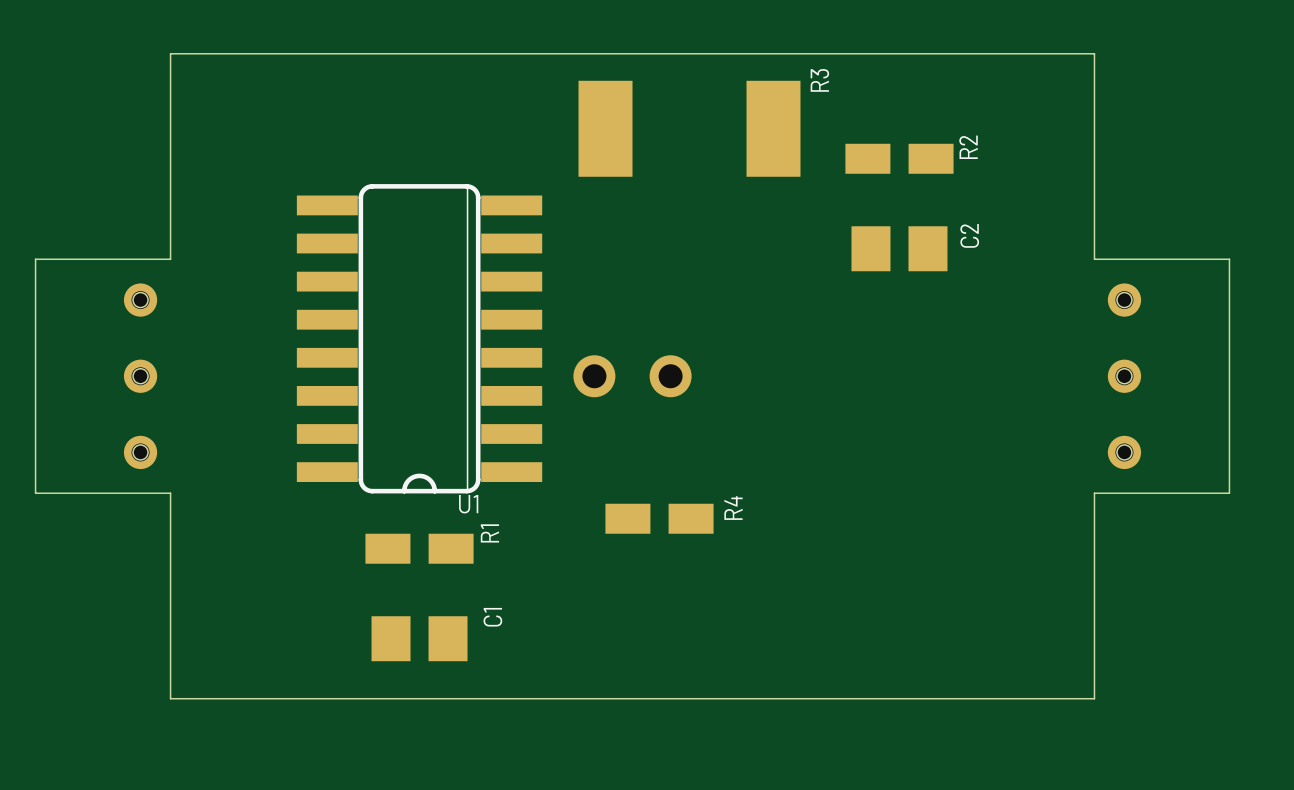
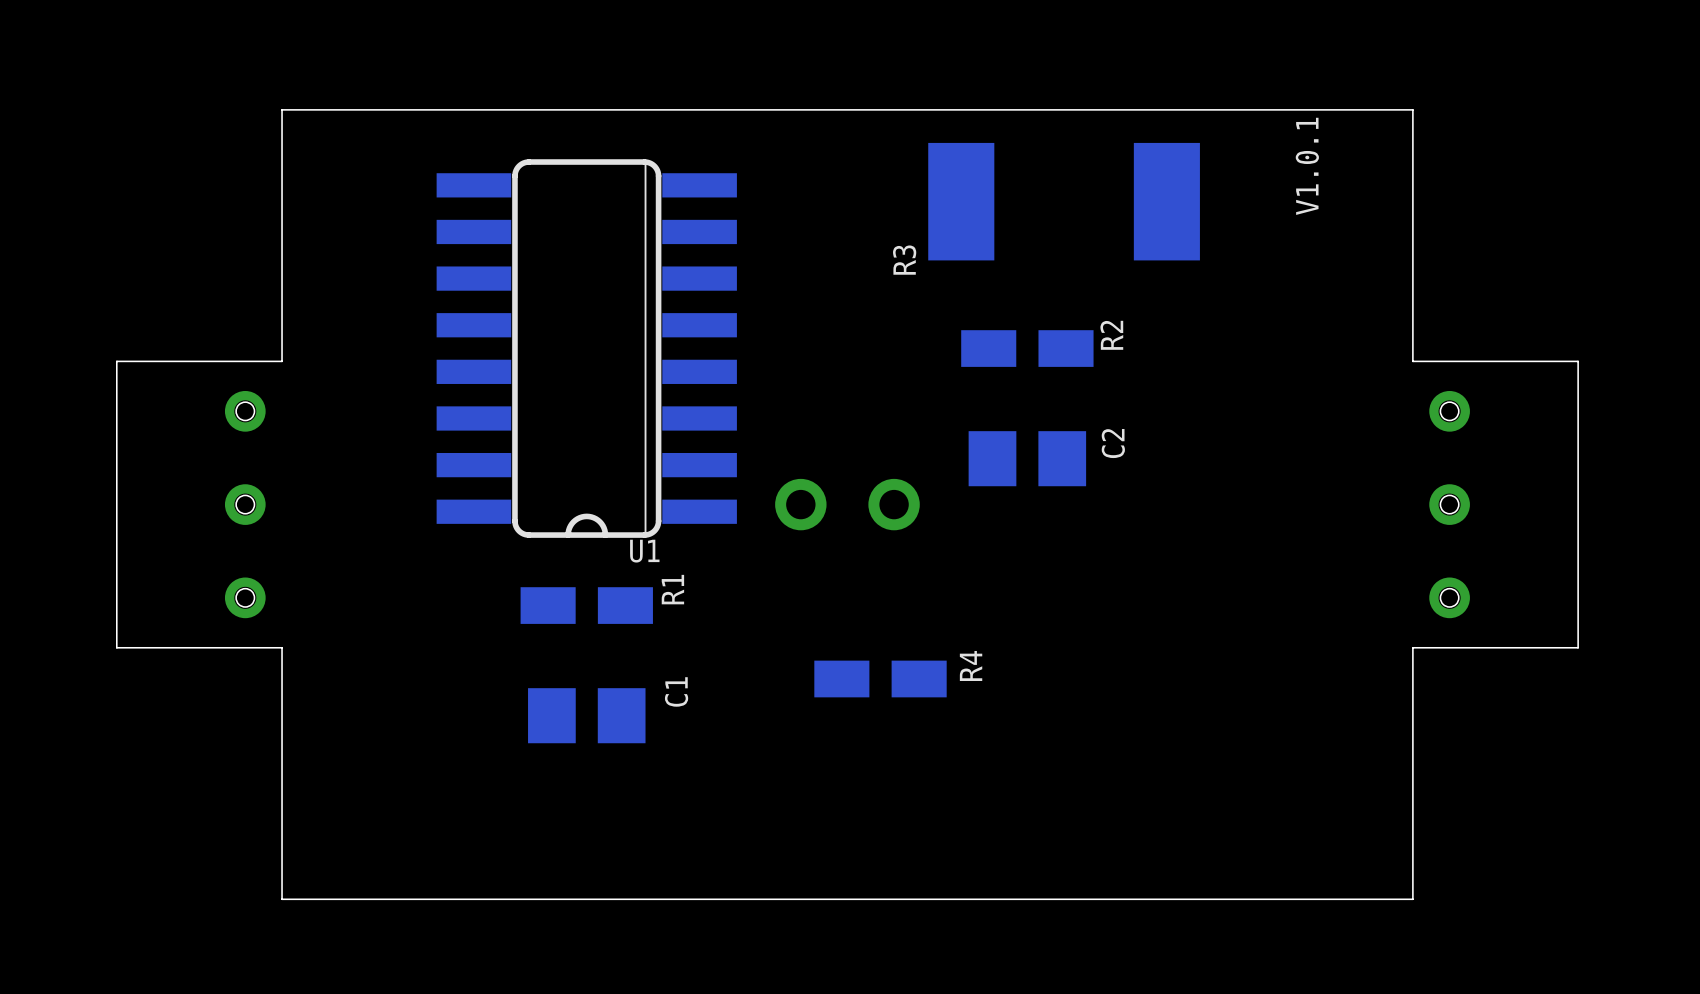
R3 name position: R3 (819, 80) -> R3 (904, 260)
text: none -> V1.0.1 (1307, 166)
R3 position: (689, 128) -> (1064, 201)
R2 position: (899, 158) -> (1027, 348)
C2 position: (899, 248) -> (1027, 458)
U1 position: (419, 338) -> (586, 348)
R1 position: (419, 548) -> (586, 605)
C1 position: (419, 638) -> (586, 715)

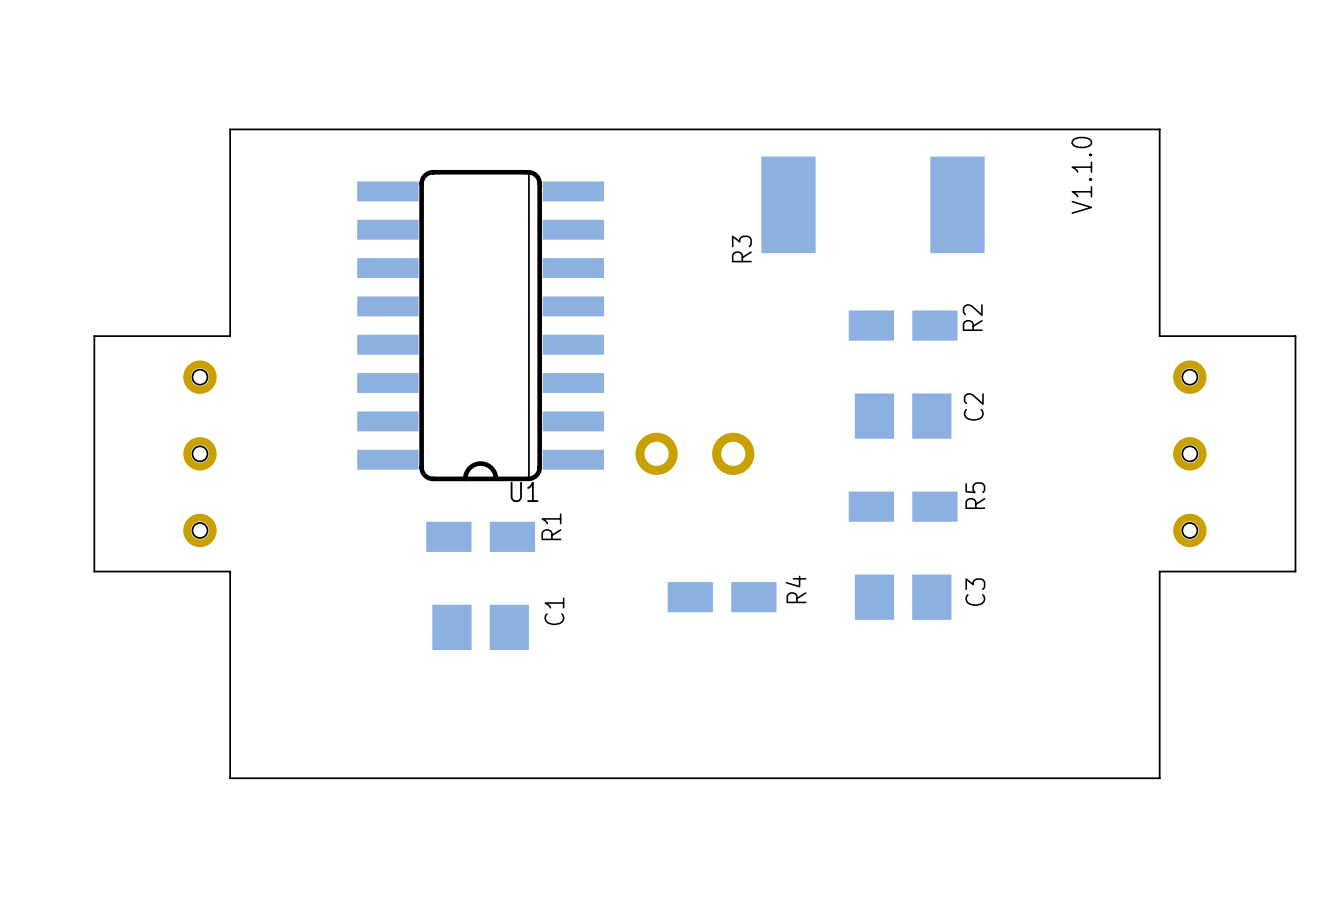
drawing: none -> [1071, 136, 1093, 214]
text: V1.0.1 (1307, 166) -> none
R2 position: (1027, 348) -> (903, 325)
C2 position: (1027, 458) -> (903, 416)
R5: none -> (903, 506)
C3: none -> (903, 597)

